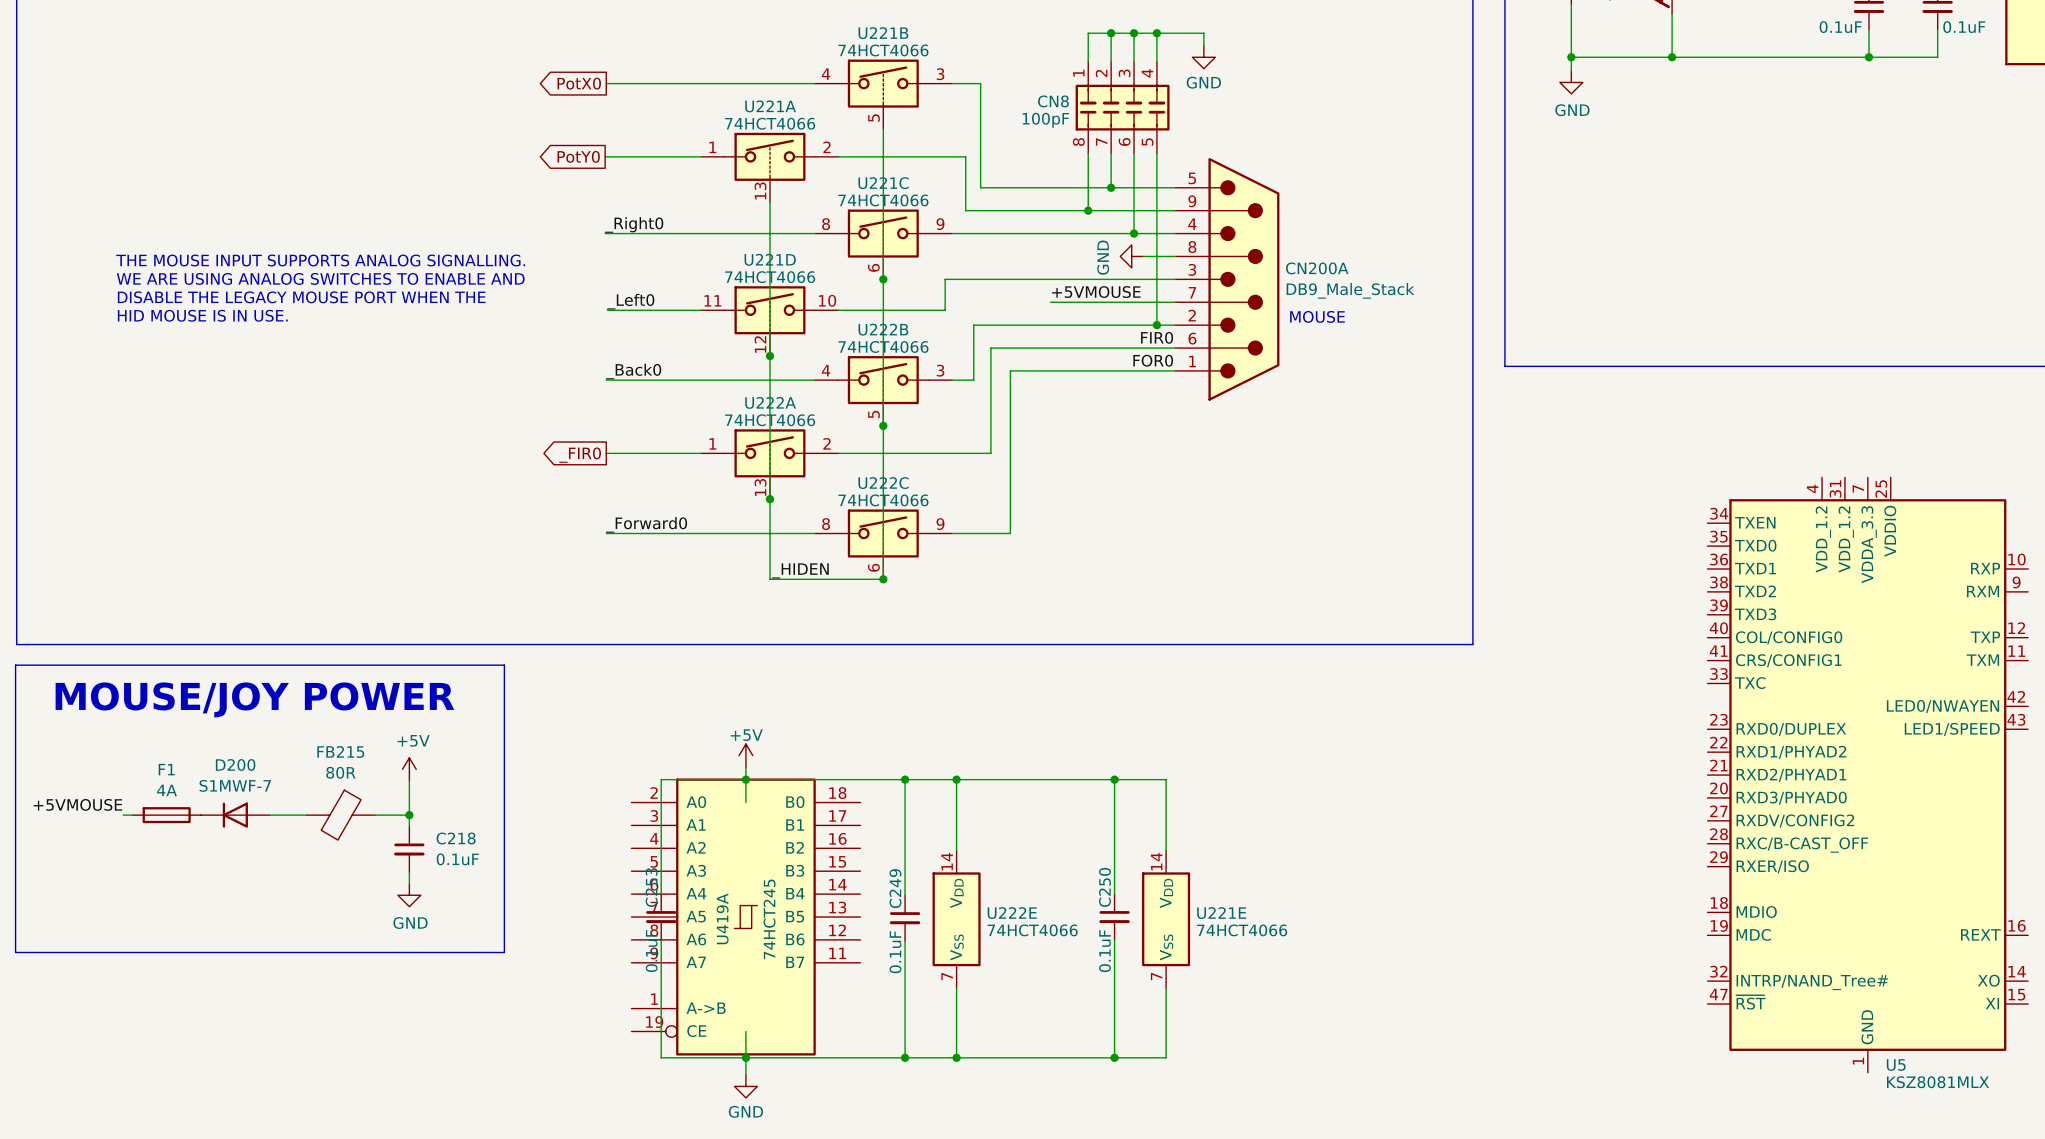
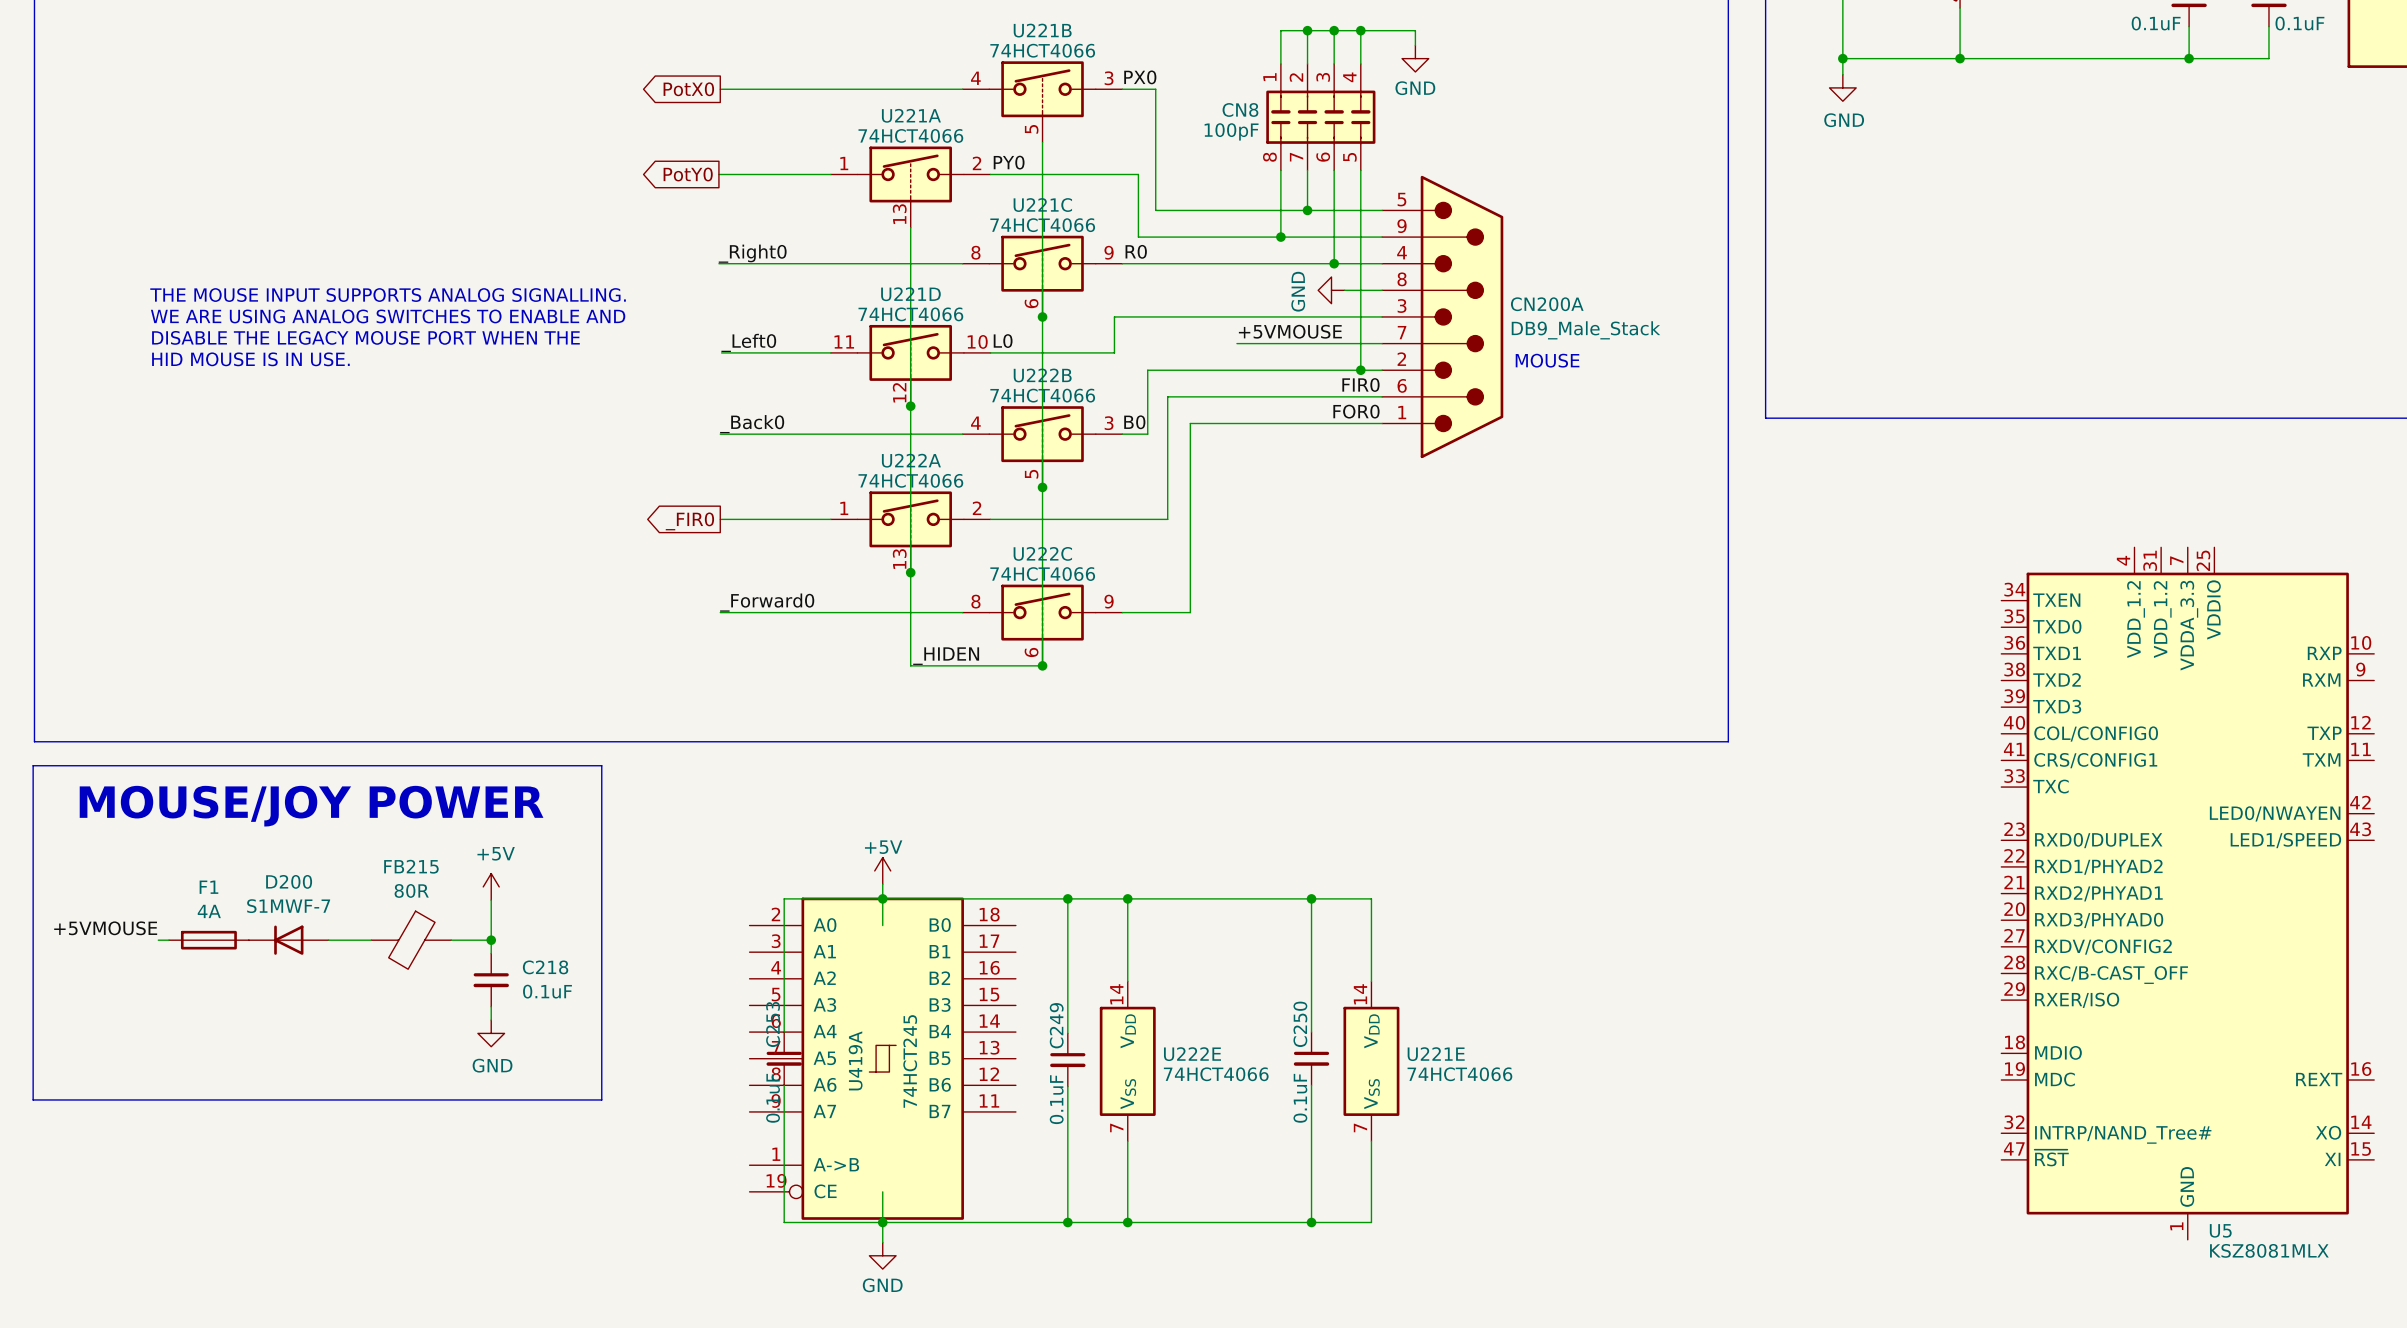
label: none -> PX0 (1140, 77)
label: none -> PY0 (1009, 162)
label: none -> R0 (1136, 251)
label: none -> L0 (1003, 341)
label: none -> B0 (1134, 422)

